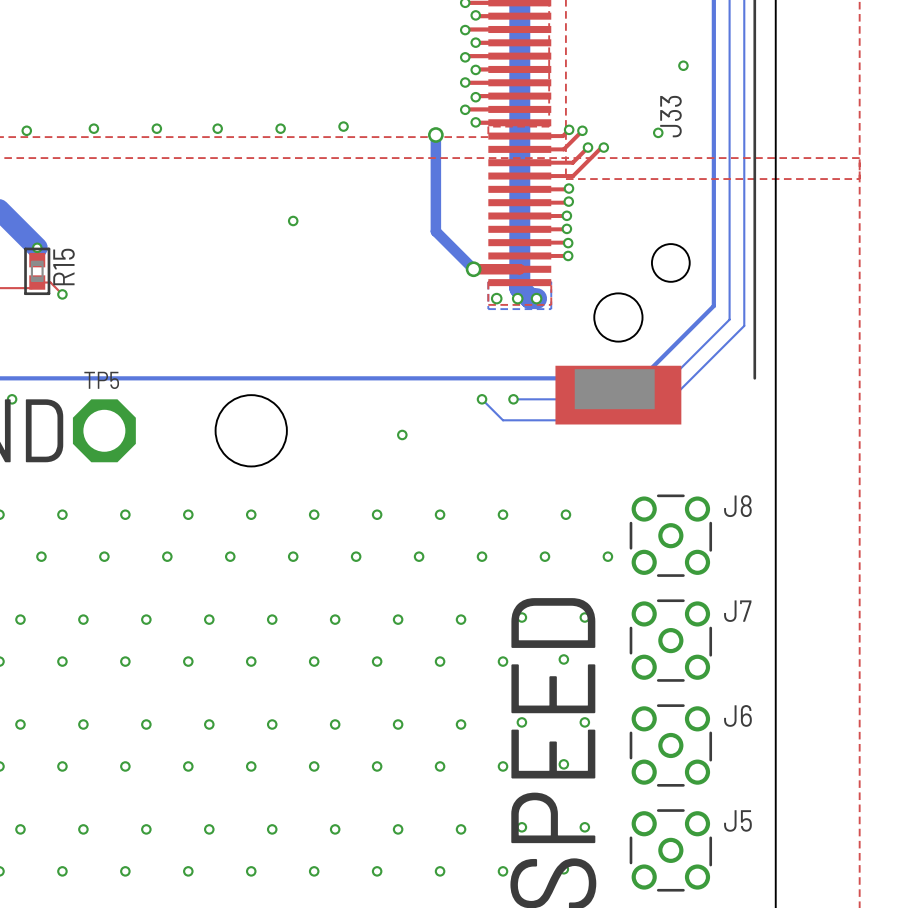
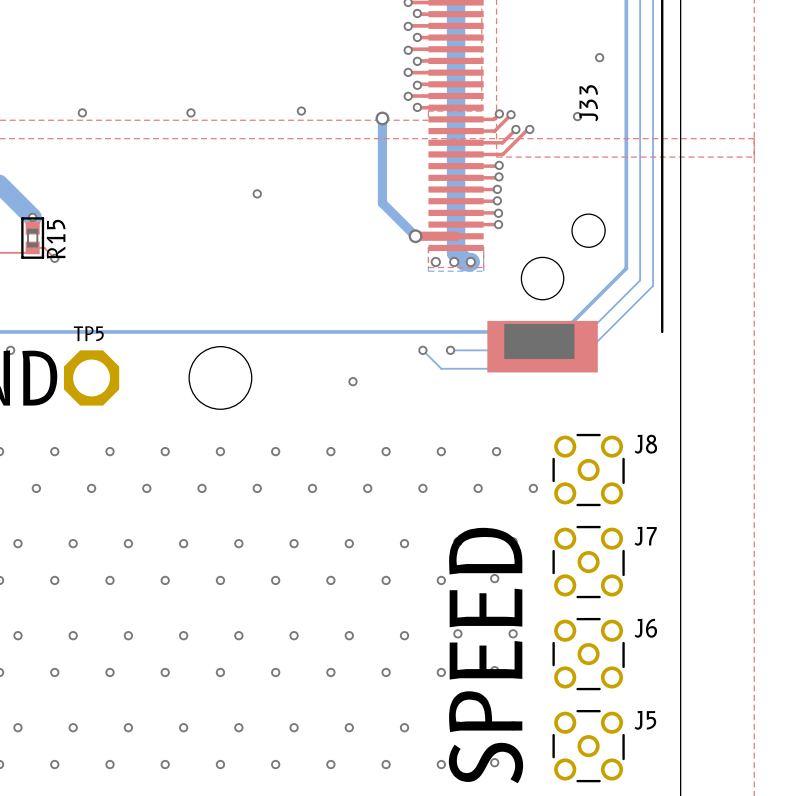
via: (156, 128) -> none
via: (280, 128) -> none
via: (26, 130) -> none

